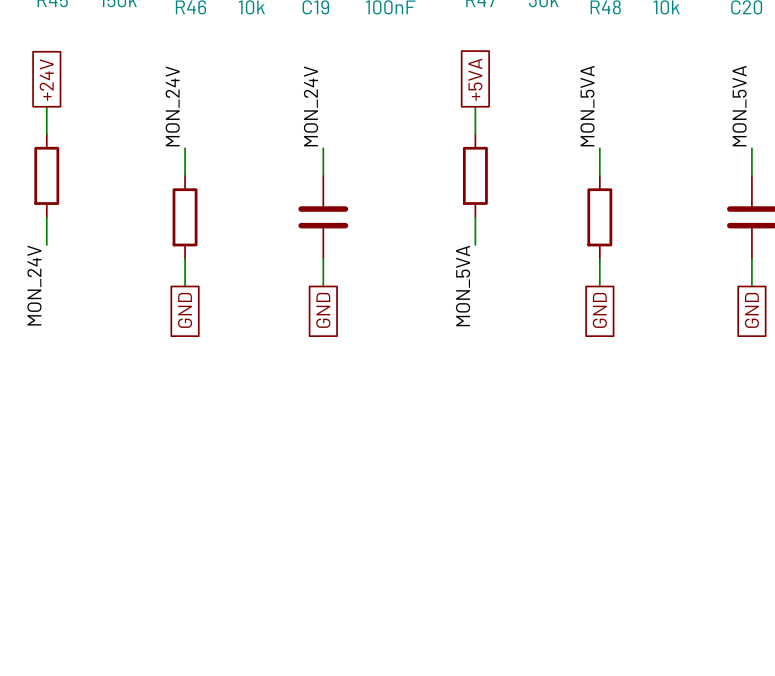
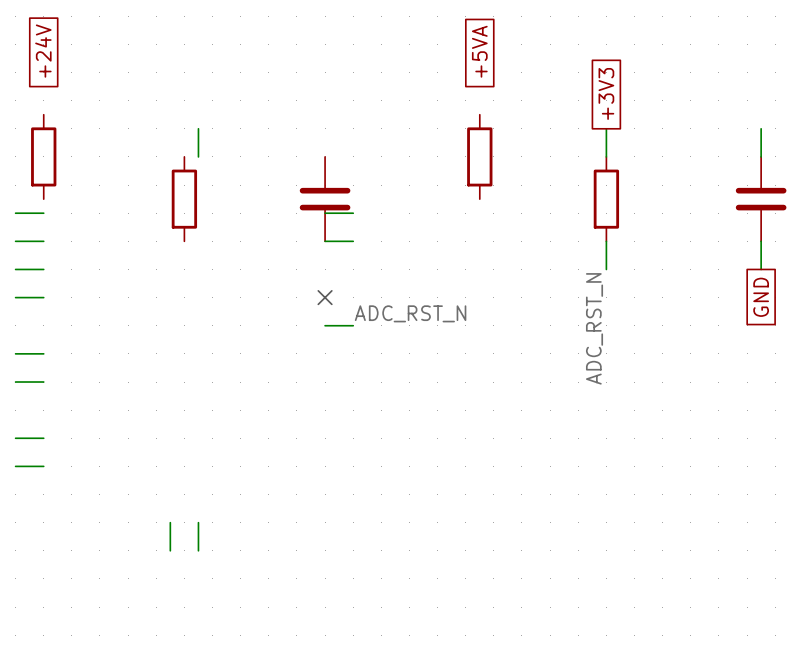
wire: (46, 106) (46, 134) -> (198, 128) (198, 156)
label: MON_24V (172, 106) -> none
label: MON_24V (310, 106) -> none
wire: (475, 106) (475, 134) -> none
label: MON_5VA (587, 106) -> none
label: MON_5VA (739, 106) -> none
global label: none -> +3V3 (606, 93)
wire: (185, 148) (185, 175) -> none
wire: (323, 148) (323, 175) -> none
wire: (46, 217) (46, 245) -> none
wire: (475, 217) (475, 245) -> none
wire: none -> (15, 213) (43, 213)
wire: none -> (325, 213) (353, 213)
wire: none -> (15, 241) (43, 241)
wire: (185, 258) (185, 286) -> none
wire: (323, 258) (323, 286) -> (325, 241) (353, 241)
label: MON_24V (34, 285) -> none
label: MON_5VA (463, 285) -> none
wire: none -> (15, 269) (43, 269)
global label: GND (185, 310) -> none
global label: GND (323, 310) -> none
global label: GND (599, 310) -> none
wire: none -> (15, 297) (43, 297)
no-connect mark: none -> (325, 297)
label: none -> ADC_RST_N (410, 313)
label: none -> ADC_RST_N (594, 328)
wire: none -> (325, 325) (353, 325)
wire: none -> (15, 353) (43, 353)
wire: none -> (15, 382) (43, 382)
wire: none -> (15, 438) (43, 438)
wire: none -> (15, 466) (43, 466)
wire: none -> (170, 522) (170, 550)
wire: none -> (198, 522) (198, 550)

